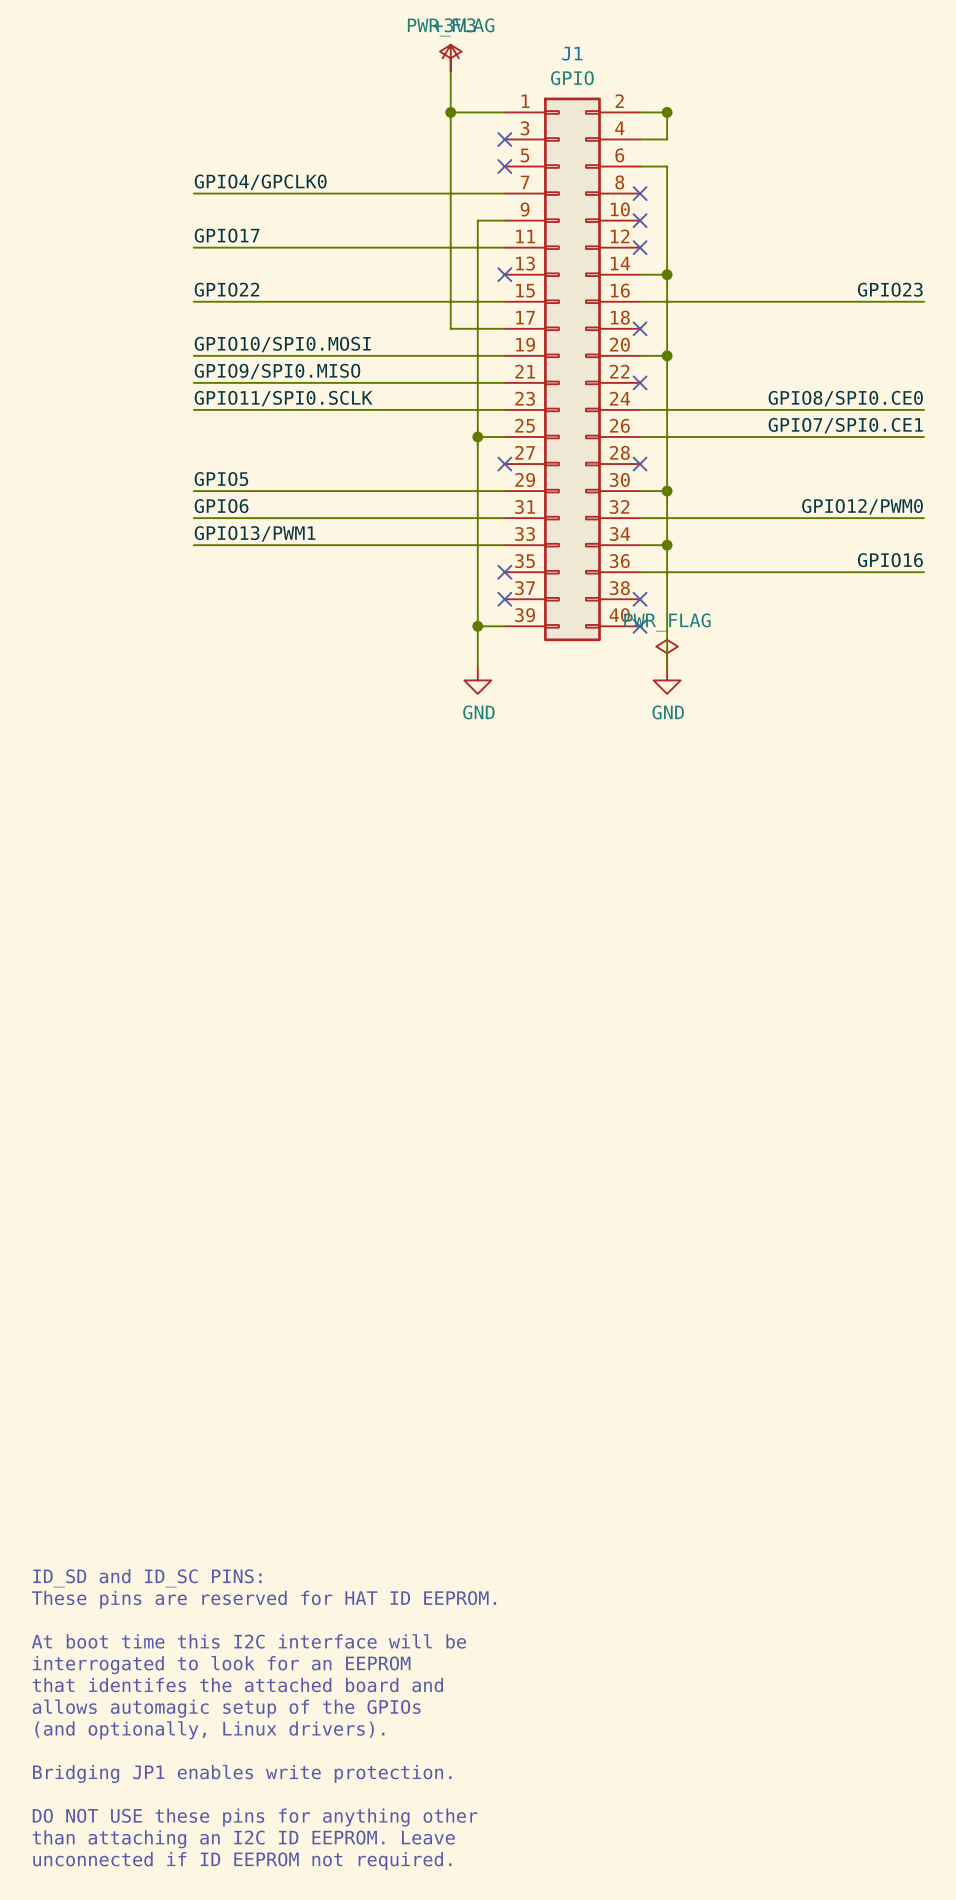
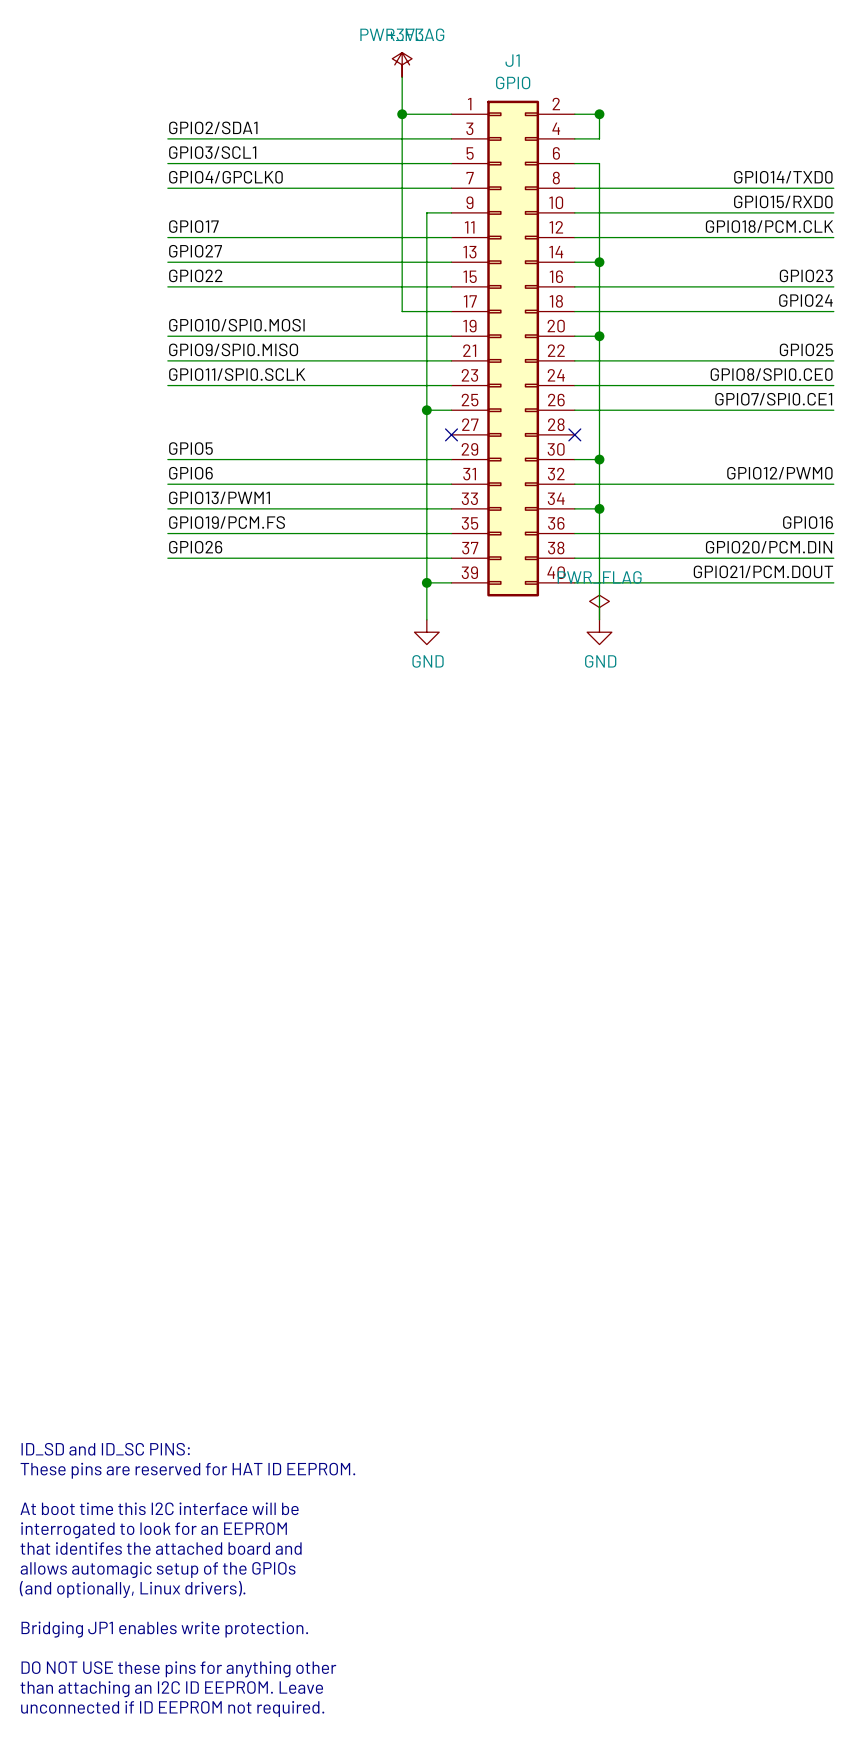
label: none -> GPIO2/SDA1 (213, 127)
wire: none -> (167, 138) (451, 138)
no-connect mark: (504, 139) -> none
label: none -> GPIO3/SCL1 (212, 152)
wire: none -> (167, 163) (451, 163)
no-connect mark: (504, 166) -> none
label: none -> GPIO14/TXD0 (783, 177)
wire: none -> (574, 188) (833, 188)
no-connect mark: (640, 193) -> none
label: none -> GPIO15/RXD0 (783, 201)
wire: none -> (574, 212) (833, 212)
no-connect mark: (640, 220) -> none
label: none -> GPIO18/PCM.CLK (769, 226)
wire: none -> (574, 237) (833, 237)
no-connect mark: (640, 247) -> none
label: none -> GPIO27 (195, 251)
wire: none -> (167, 262) (451, 262)
no-connect mark: (504, 274) -> none
label: none -> GPIO24 (805, 300)
wire: none -> (574, 311) (833, 311)
no-connect mark: (640, 328) -> none
label: none -> GPIO25 (806, 349)
wire: none -> (574, 360) (833, 360)
no-connect mark: (640, 382) -> none
label: none -> GPIO19/PCM.FS (227, 522)
wire: none -> (167, 533) (451, 533)
no-connect mark: (504, 572) -> none
label: none -> GPIO26 (195, 547)
label: none -> GPIO20/PCM.DIN (769, 547)
wire: none -> (167, 558) (451, 558)
no-connect mark: (504, 599) -> none
wire: none -> (574, 558) (833, 558)
no-connect mark: (640, 599) -> none
label: none -> GPIO21/PCM.DOUT (763, 571)
wire: none -> (574, 582) (833, 582)
no-connect mark: (640, 626) -> none

